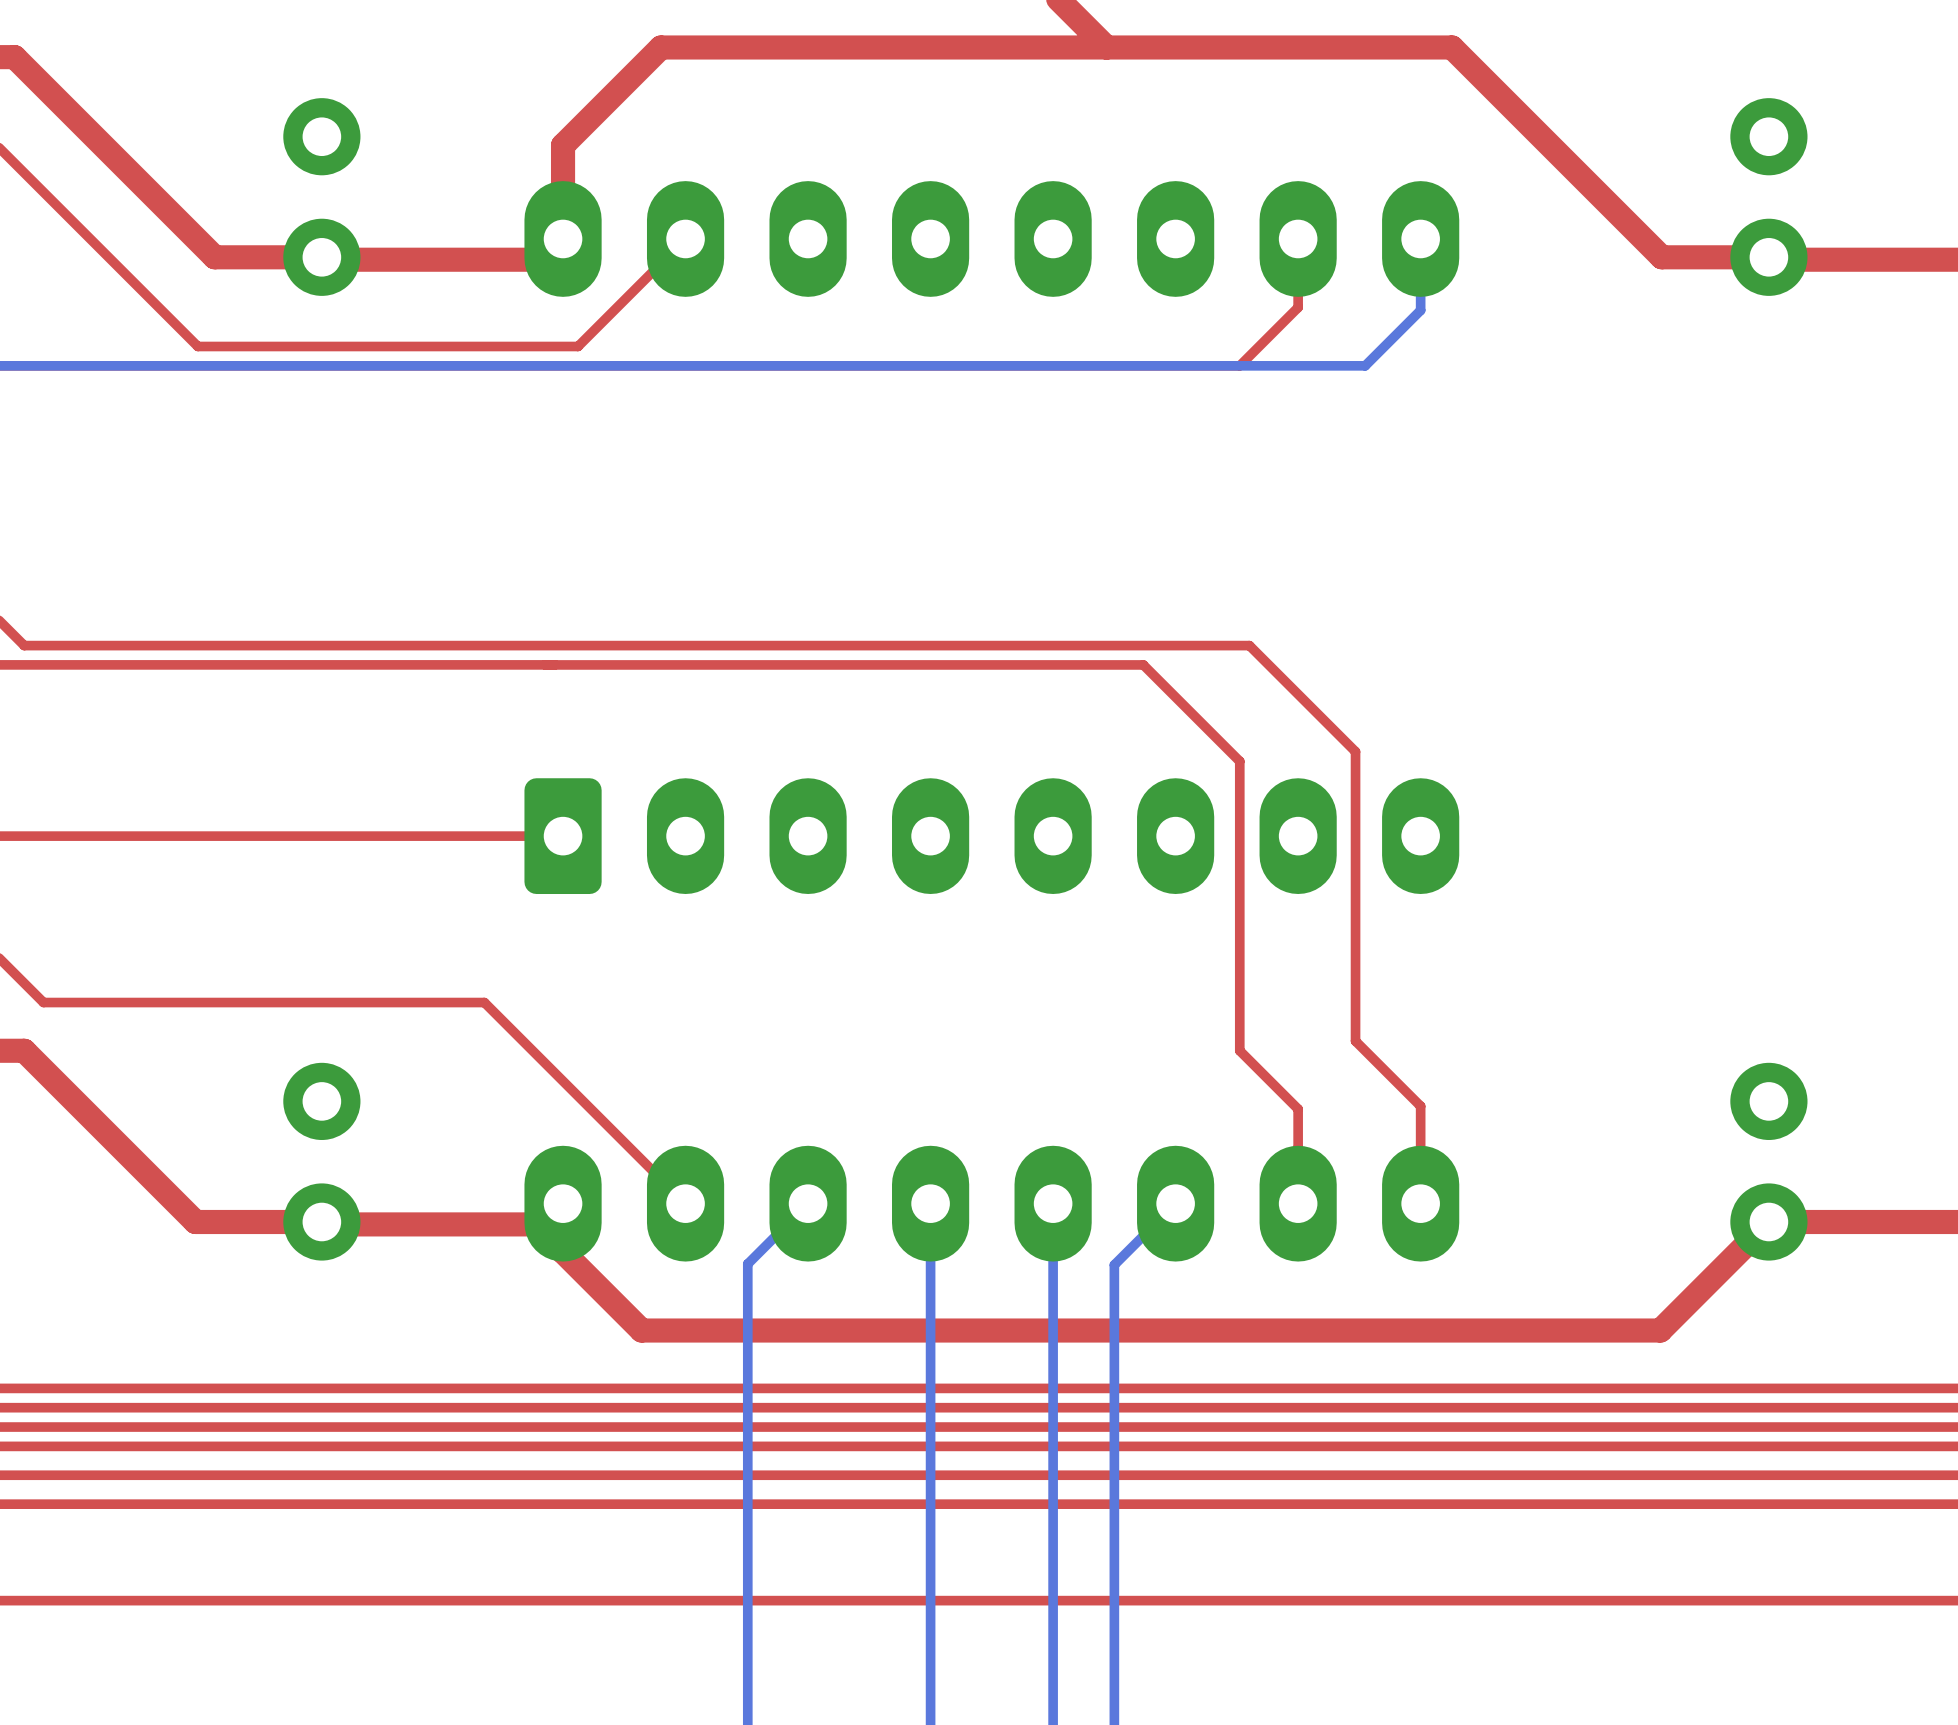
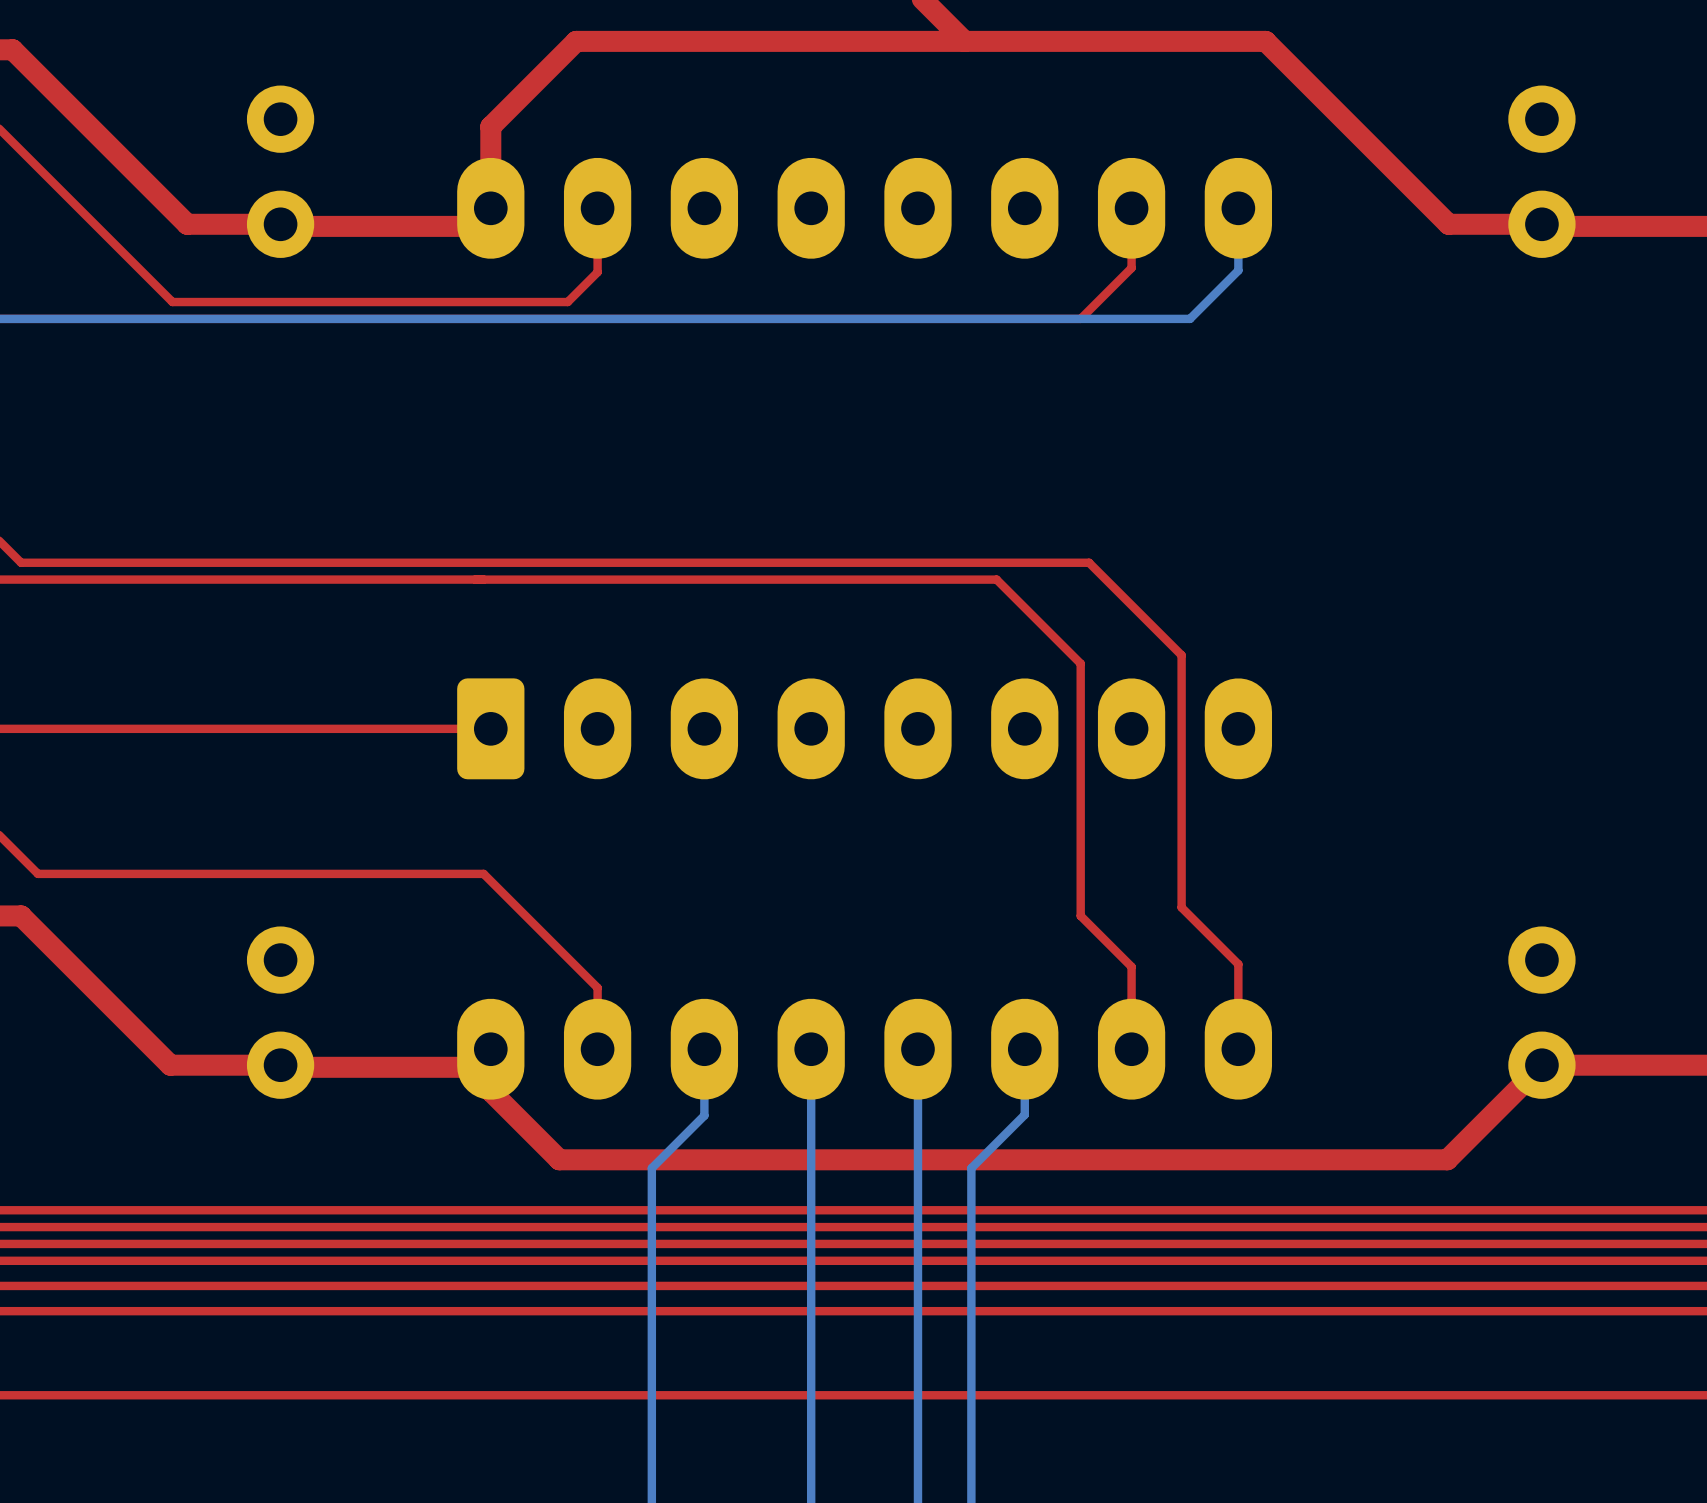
top track: (685, 238) (578, 346) -> (597, 208) (597, 272) (567, 302) (503, 302)
top track: (484, 1002) (685, 1203) -> (422, 873) (483, 873) (597, 987) (597, 1049)
bottom track: (808, 1203) (747, 1263) (747, 1340) -> (704, 1049) (704, 1115) (651, 1168)
bottom track: (1175, 1203) (1114, 1264) (1114, 1340) -> (1024, 1049) (1024, 1114) (971, 1168)

